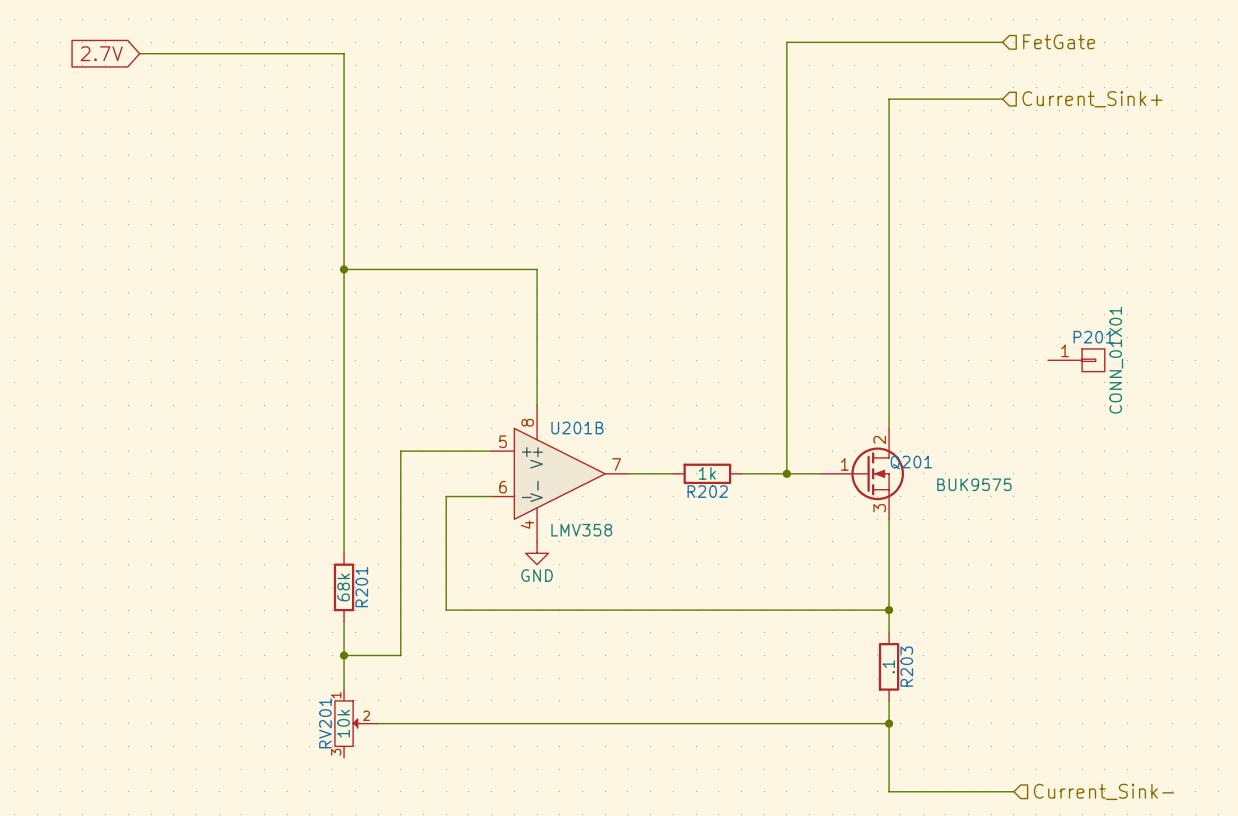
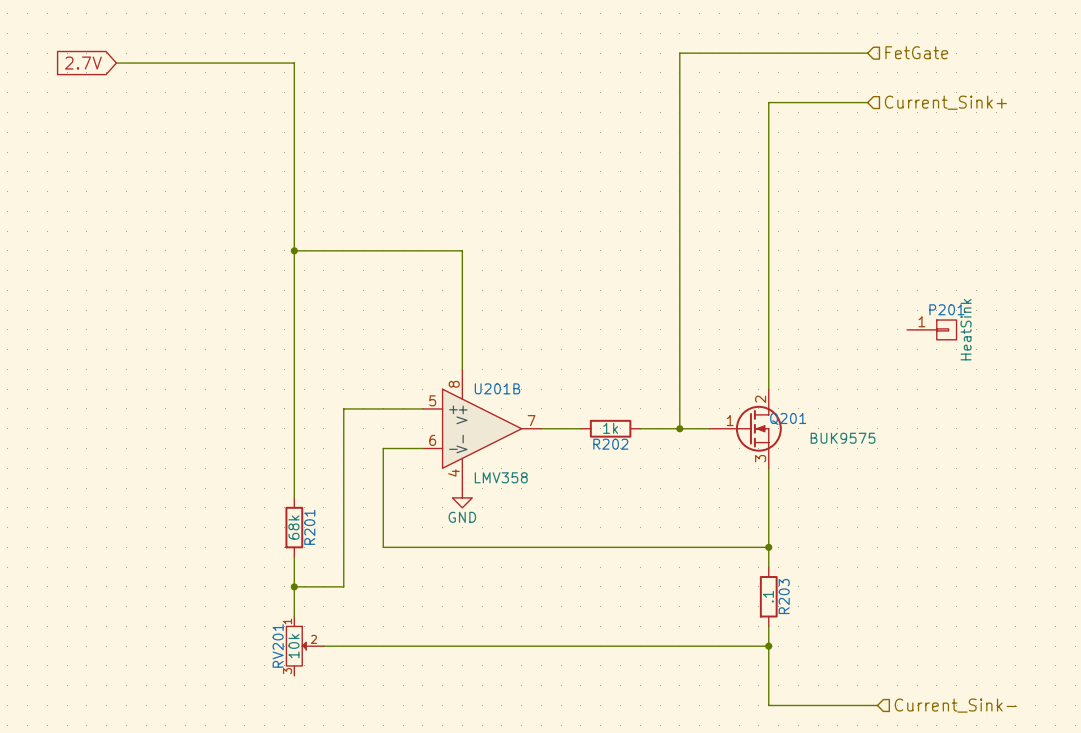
P201 value: CONN_01X01 (1116, 360) -> HeatSink (966, 329)

